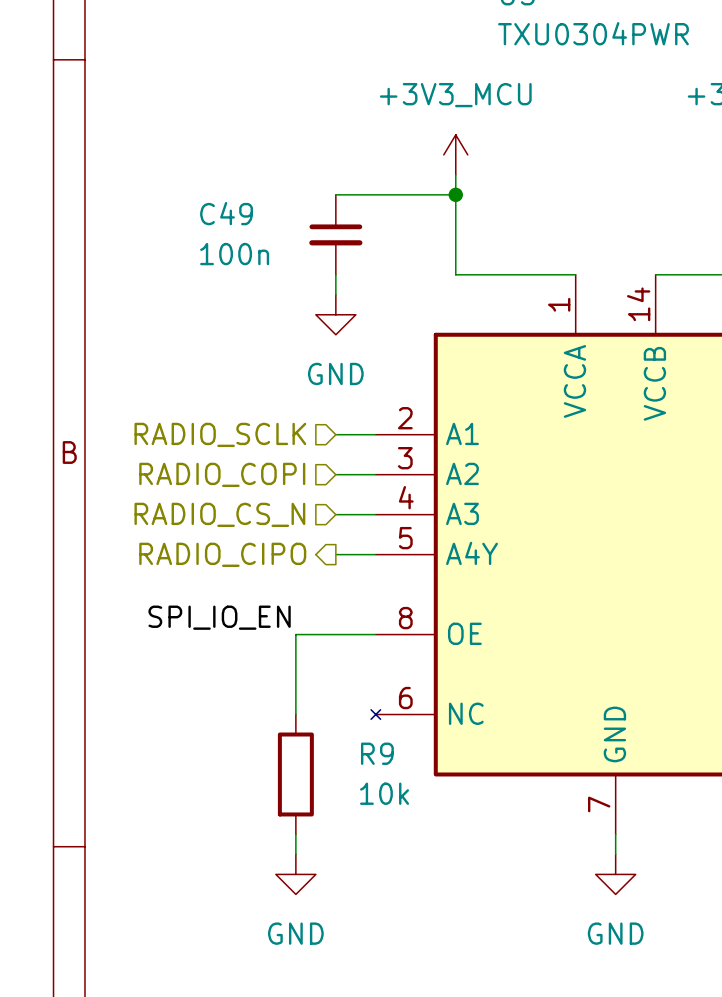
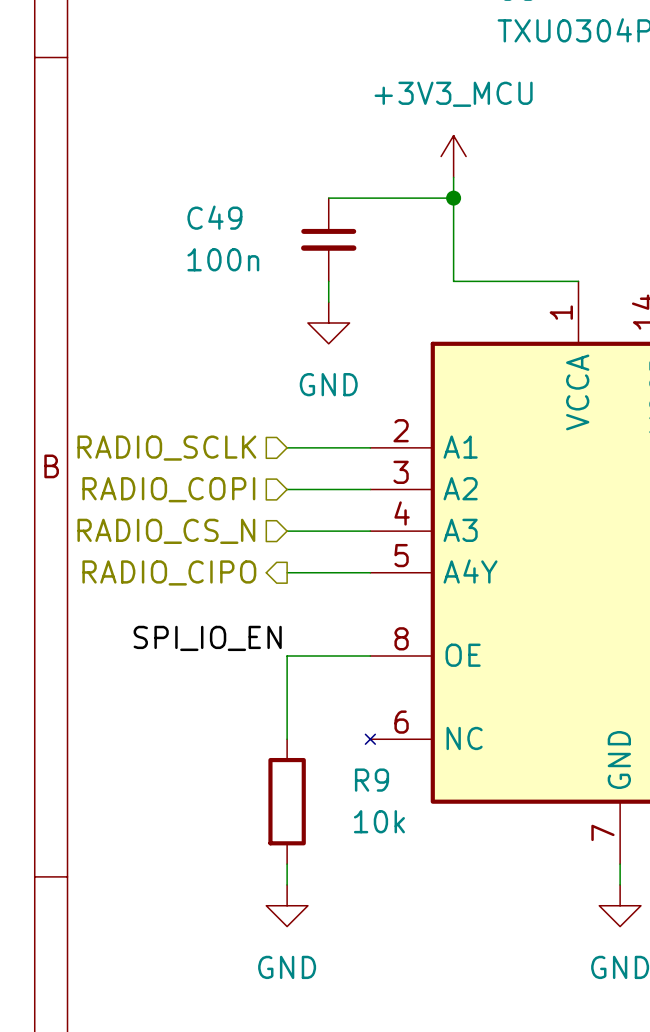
hierarchical label position: RADIO_SCLK (220, 434) -> RADIO_SCLK (166, 448)
wire: none -> (287, 447) (328, 447)
hierarchical label position: RADIO_COPI (222, 474) -> RADIO_COPI (168, 489)
wire: none -> (287, 489) (328, 489)
hierarchical label position: RADIO_CS_N (219, 514) -> RADIO_CS_N (166, 531)
wire: none -> (287, 531) (328, 531)
hierarchical label position: RADIO_CIPO (222, 554) -> RADIO_CIPO (169, 572)
wire: none -> (287, 572) (328, 572)

